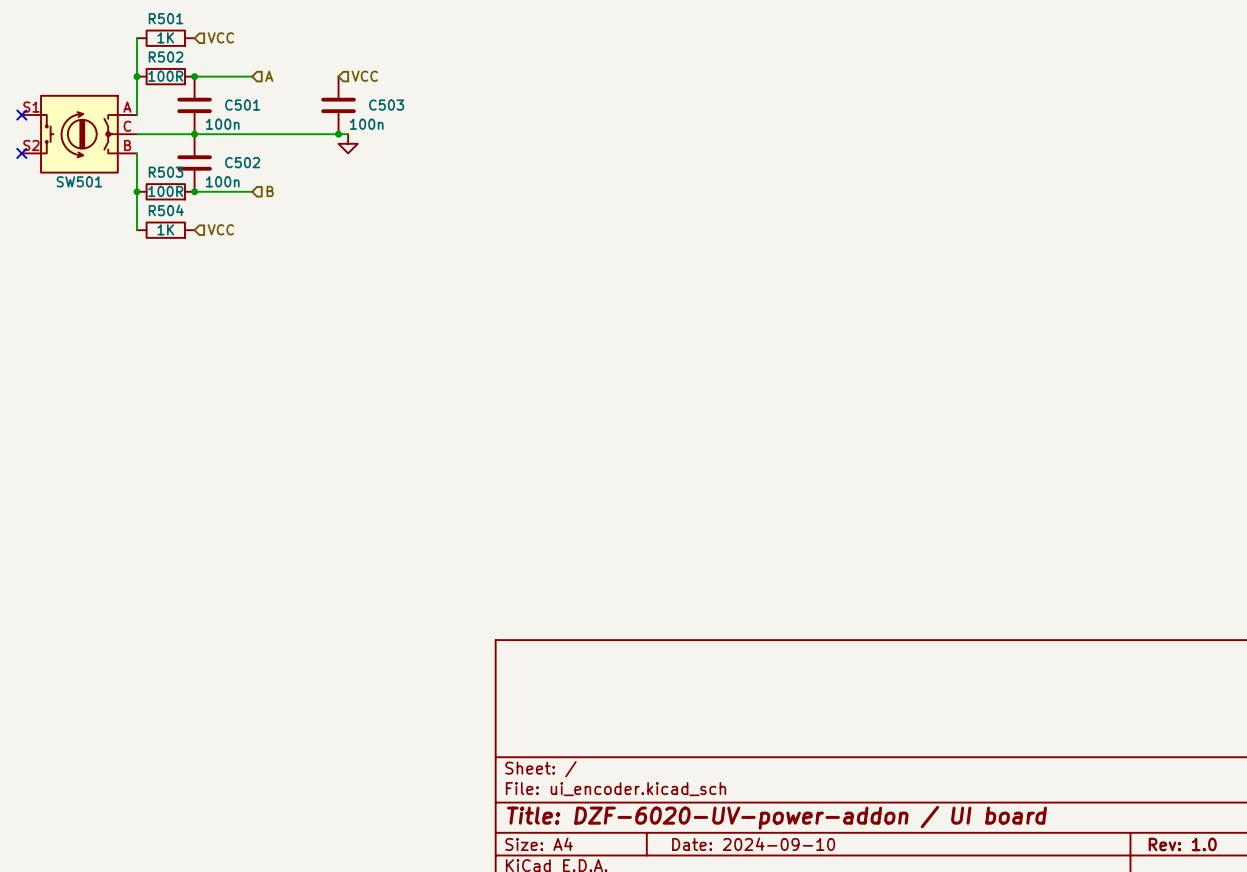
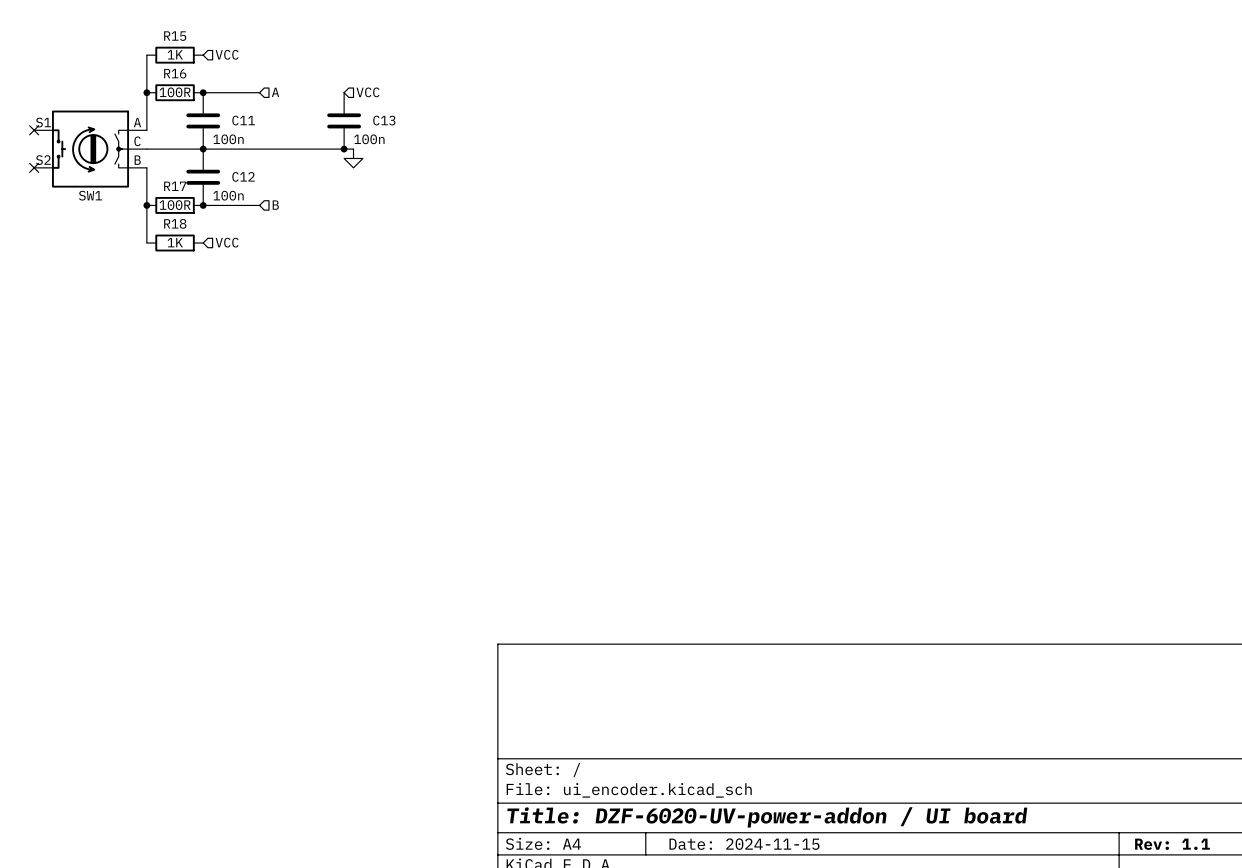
R501 name: R501 (166, 18) -> R15 (175, 36)
R502 name: R502 (166, 57) -> R16 (175, 73)
C501 name: C501 (242, 105) -> C11 (243, 120)
C503 name: C503 (386, 105) -> C13 (384, 120)
C502 name: C502 (242, 162) -> C12 (243, 176)
R503 name: R503 (166, 172) -> R17 (175, 186)
SW501 name: SW501 (79, 181) -> SW1 (90, 195)
R504 name: R504 (166, 210) -> R18 (175, 223)
title block: Date: 2024-09-10 (753, 844) -> Date: 2024-11-15 (744, 844)
title block: Rev: 1.0 (1182, 844) -> Rev: 1.1 (1172, 844)

